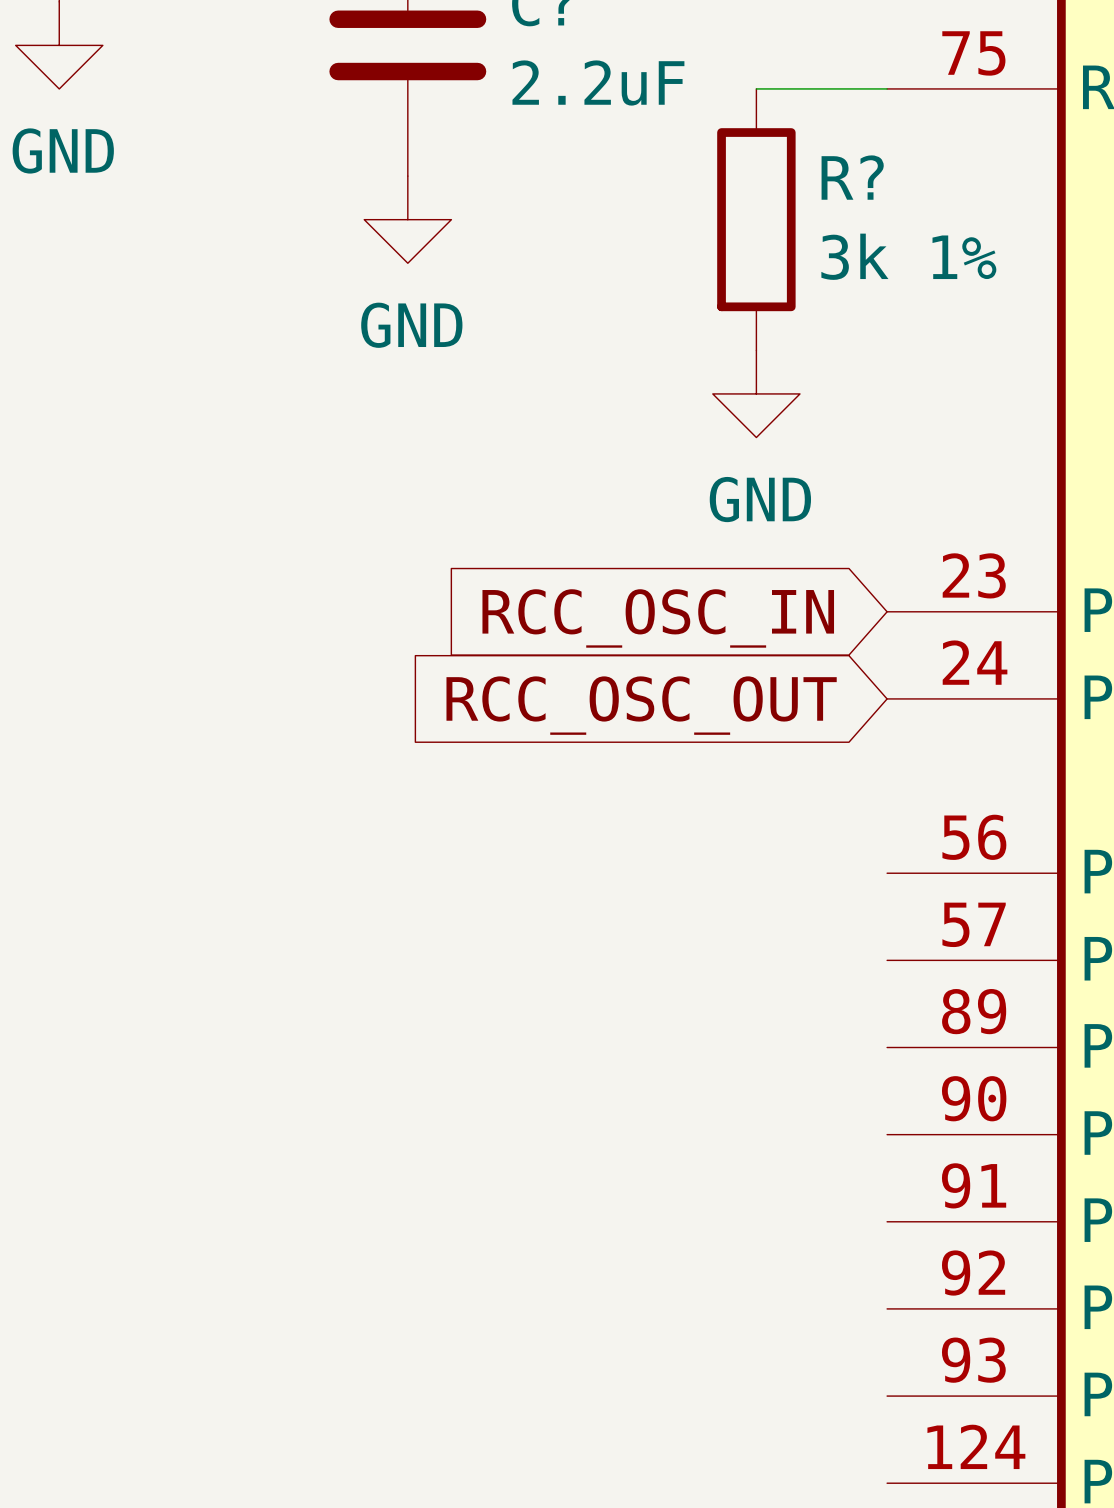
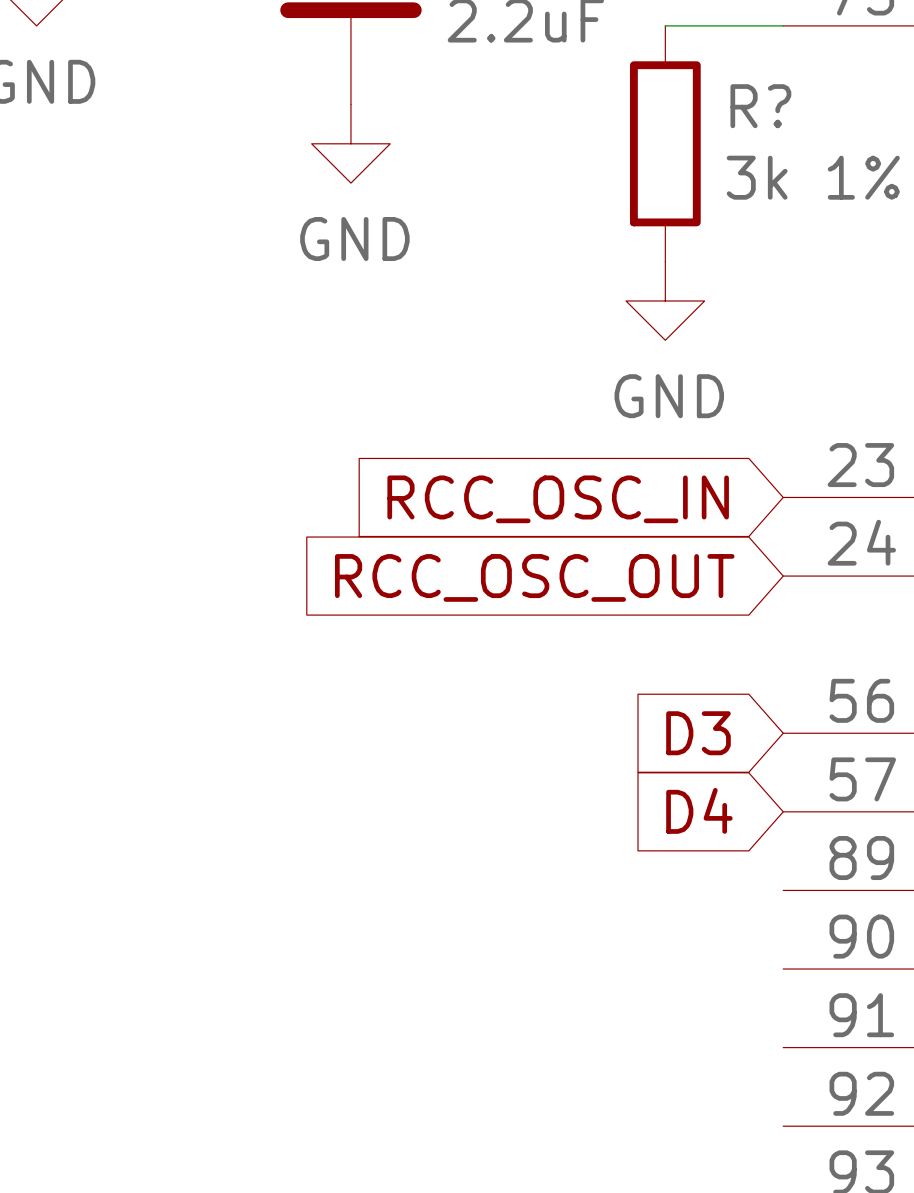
global label: none -> D3 (698, 733)
global label: none -> D4 (699, 810)

